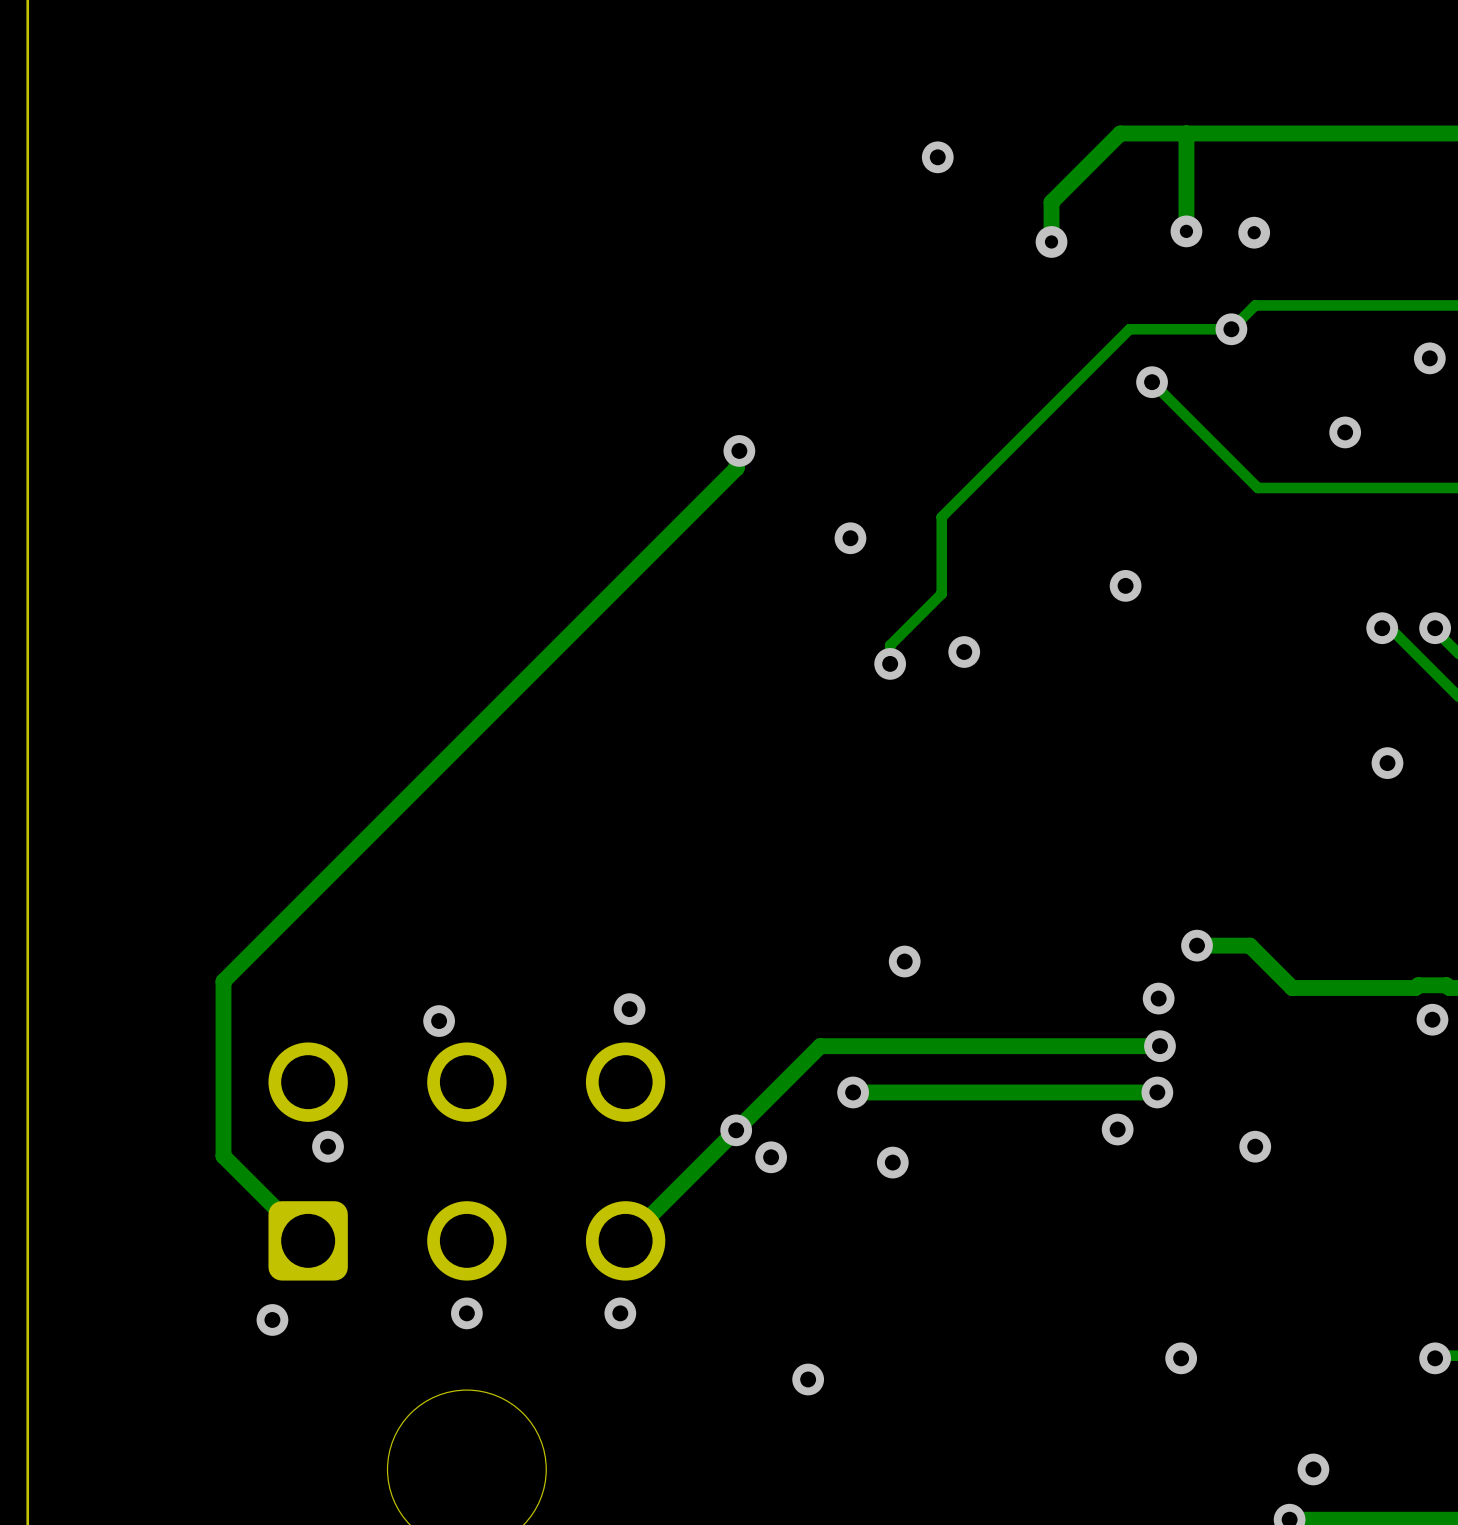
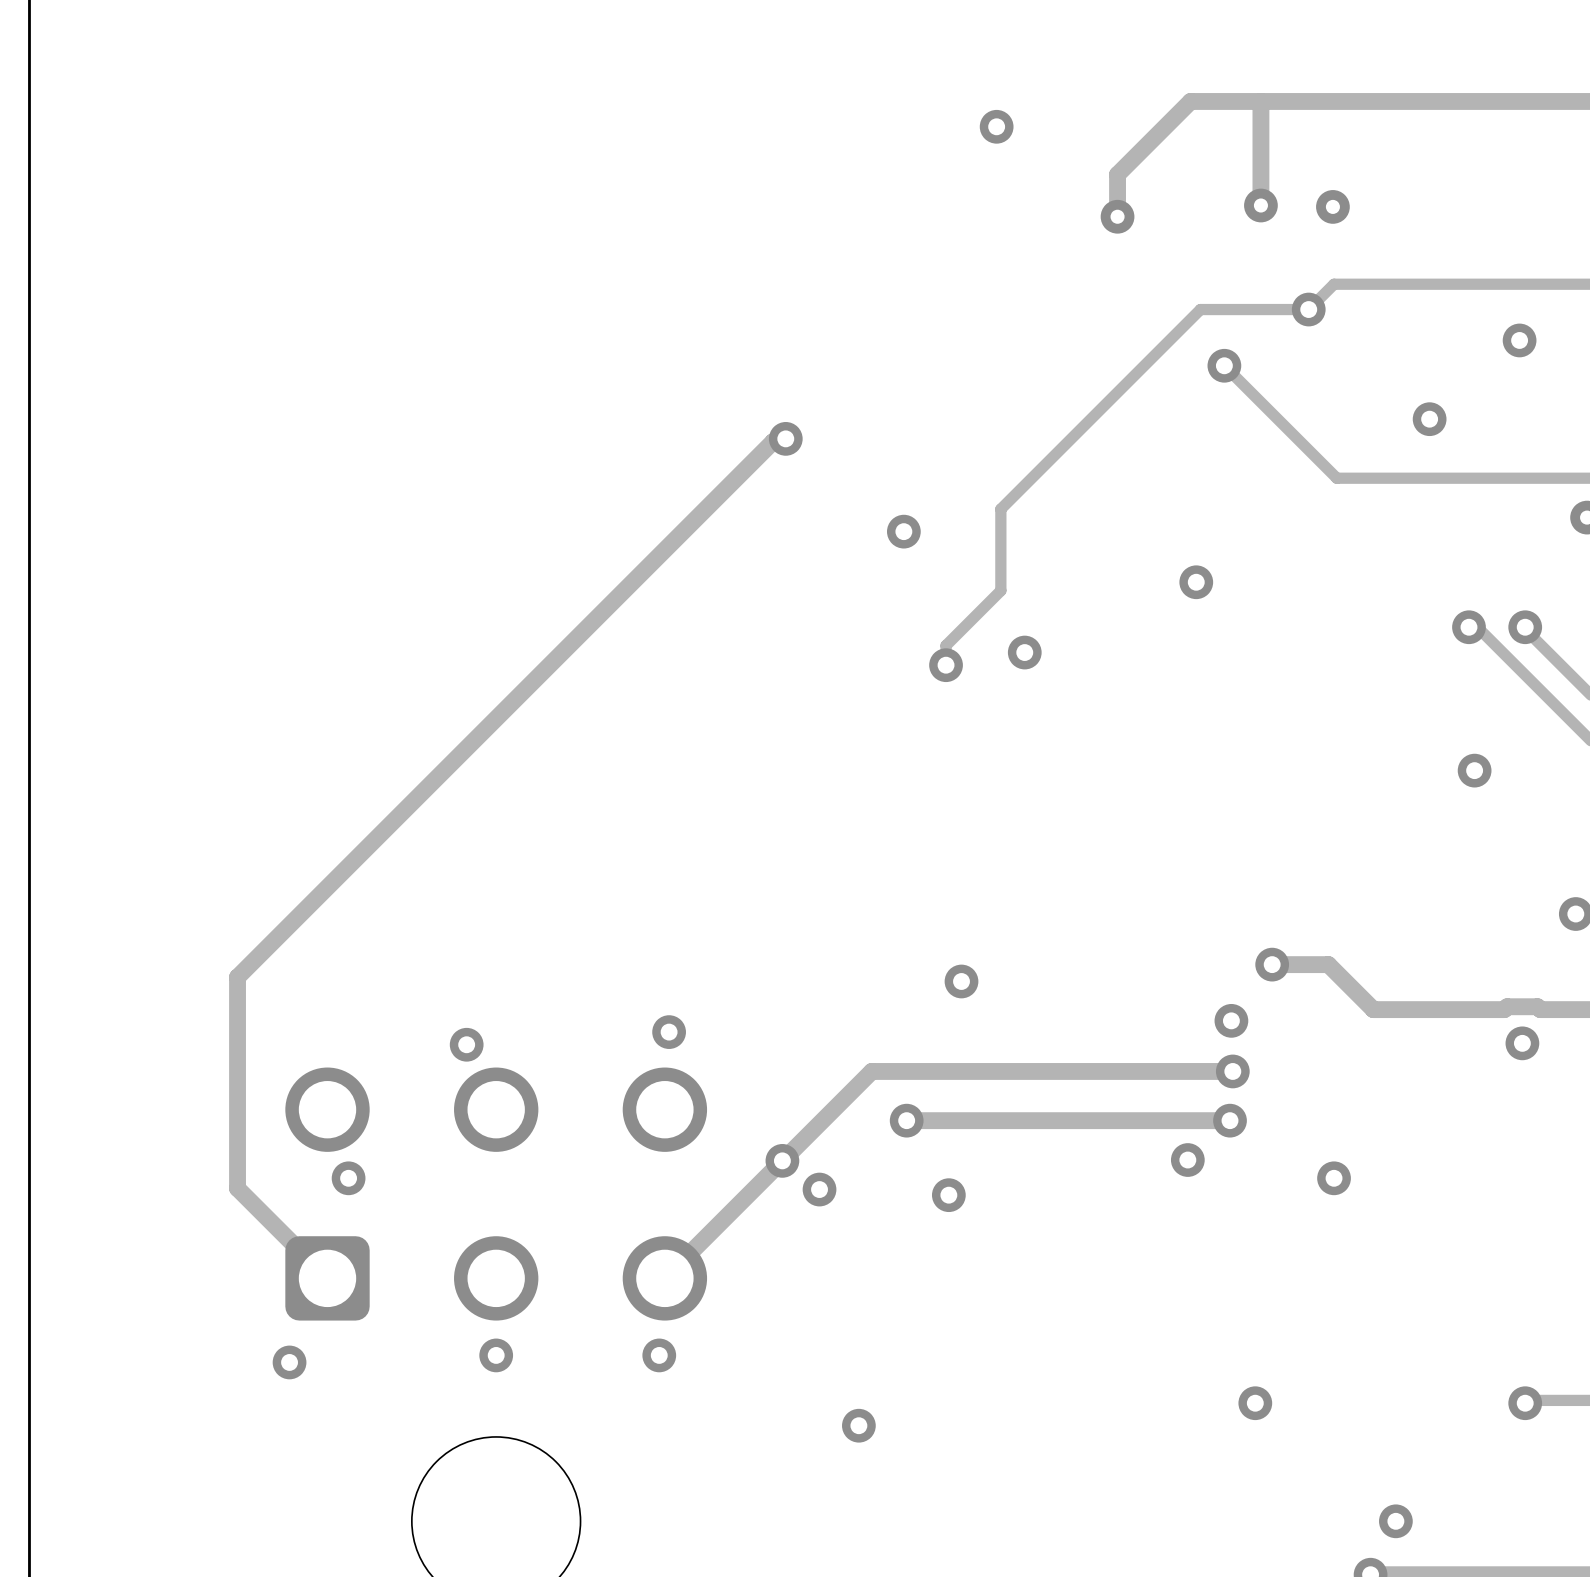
track: (736, 453) (736, 468) (223, 981) -> (782, 441) (773, 441) (237, 977) (237, 1002)

